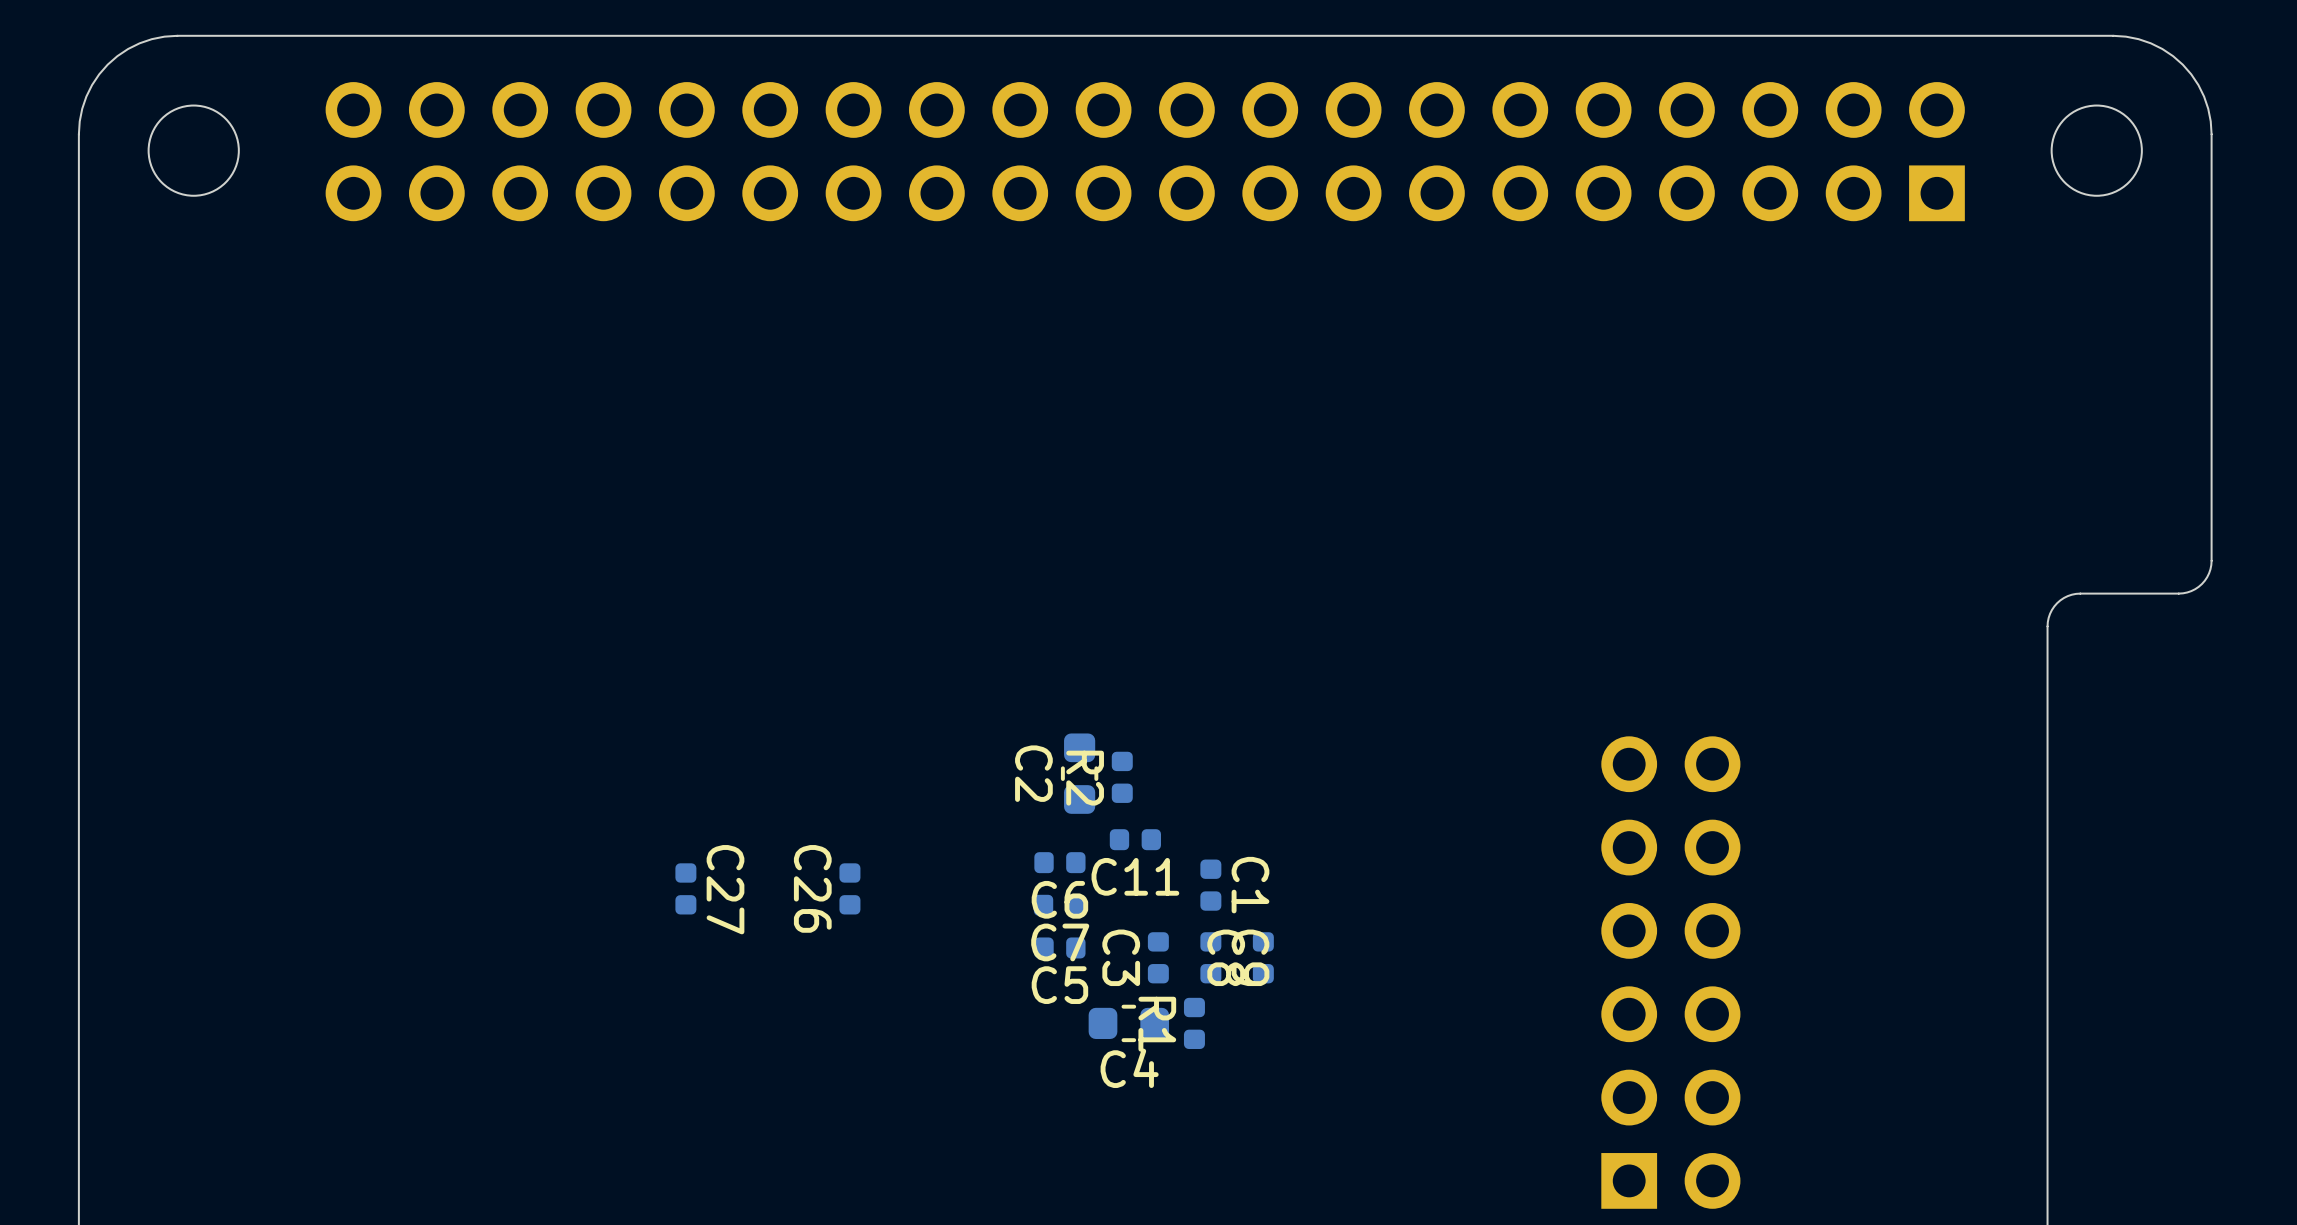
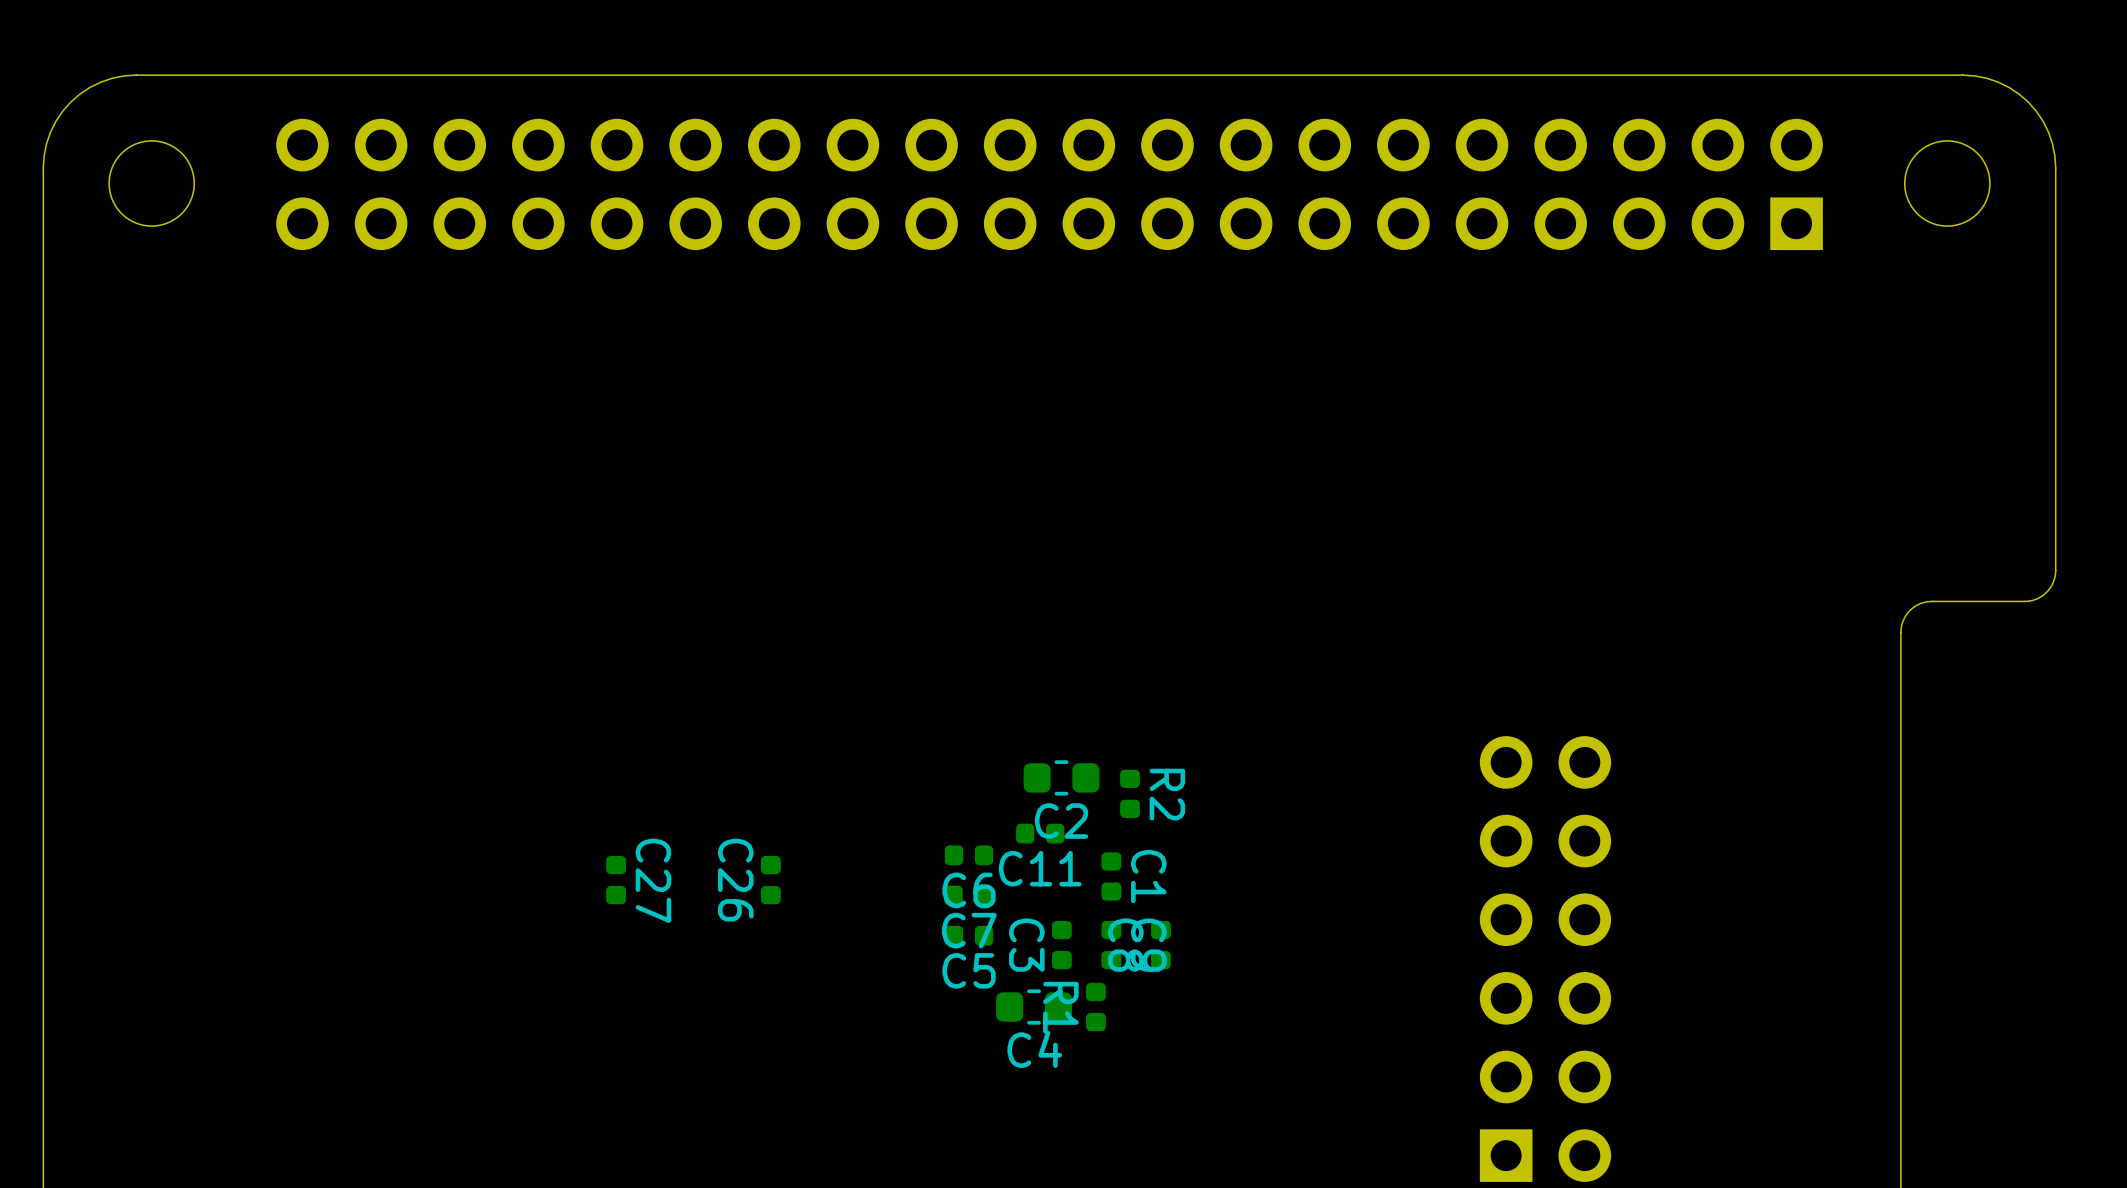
C2 name position: C2 (1033, 773) -> C2 (1061, 821)
C2 rotation: 0° (1079, 773) -> 90° clockwise (1061, 777)
C2 position: (1079, 773) -> (1061, 777)
R2 position: (1122, 777) -> (1130, 793)
R2 name position: R2 (1085, 778) -> R2 (1167, 794)

